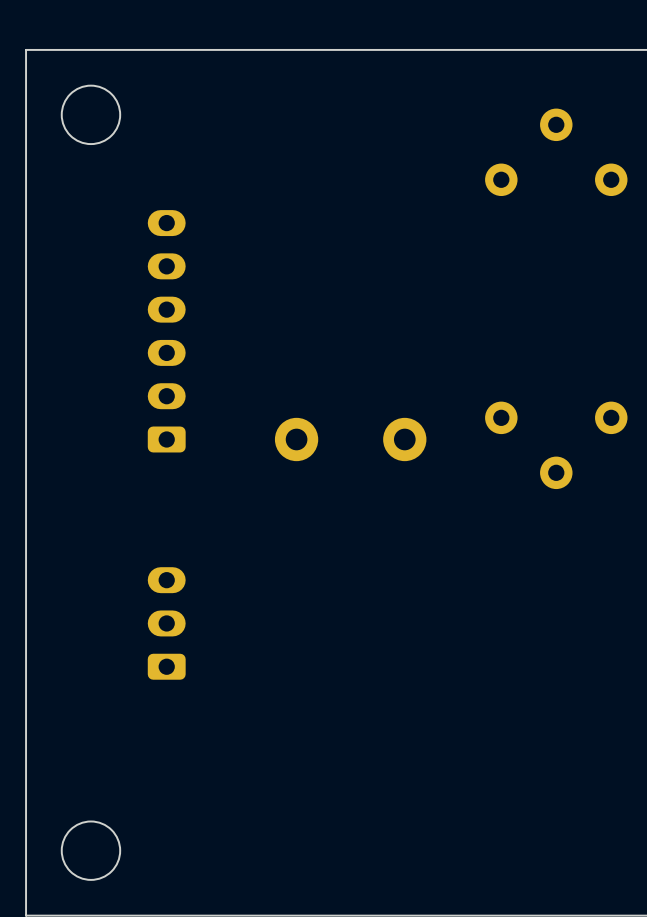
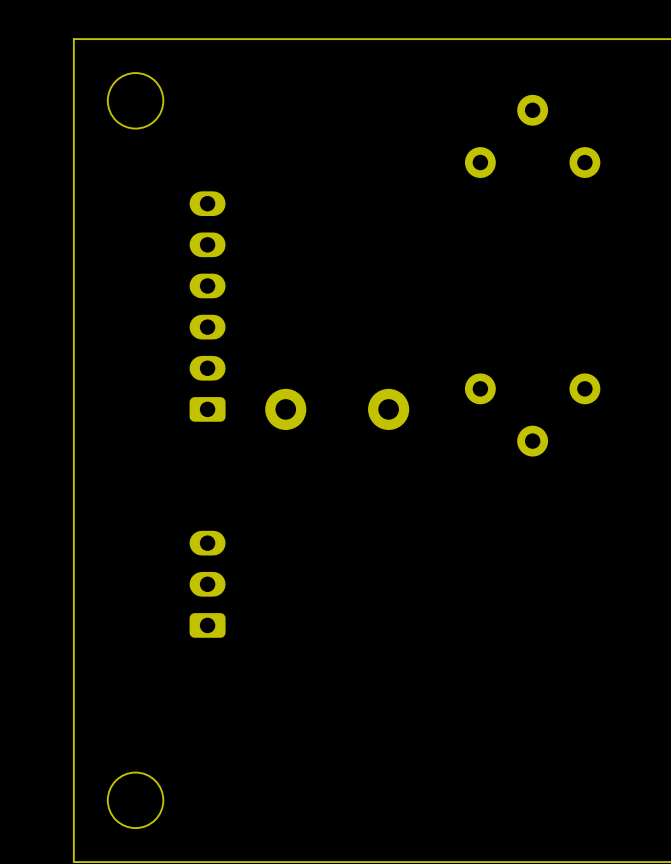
part position: (556, 152) -> (532, 136)
part: none -> (285, 409)
part: (296, 439) -> none
part: none -> (388, 409)
part: (404, 439) -> none
part position: (556, 445) -> (532, 414)

